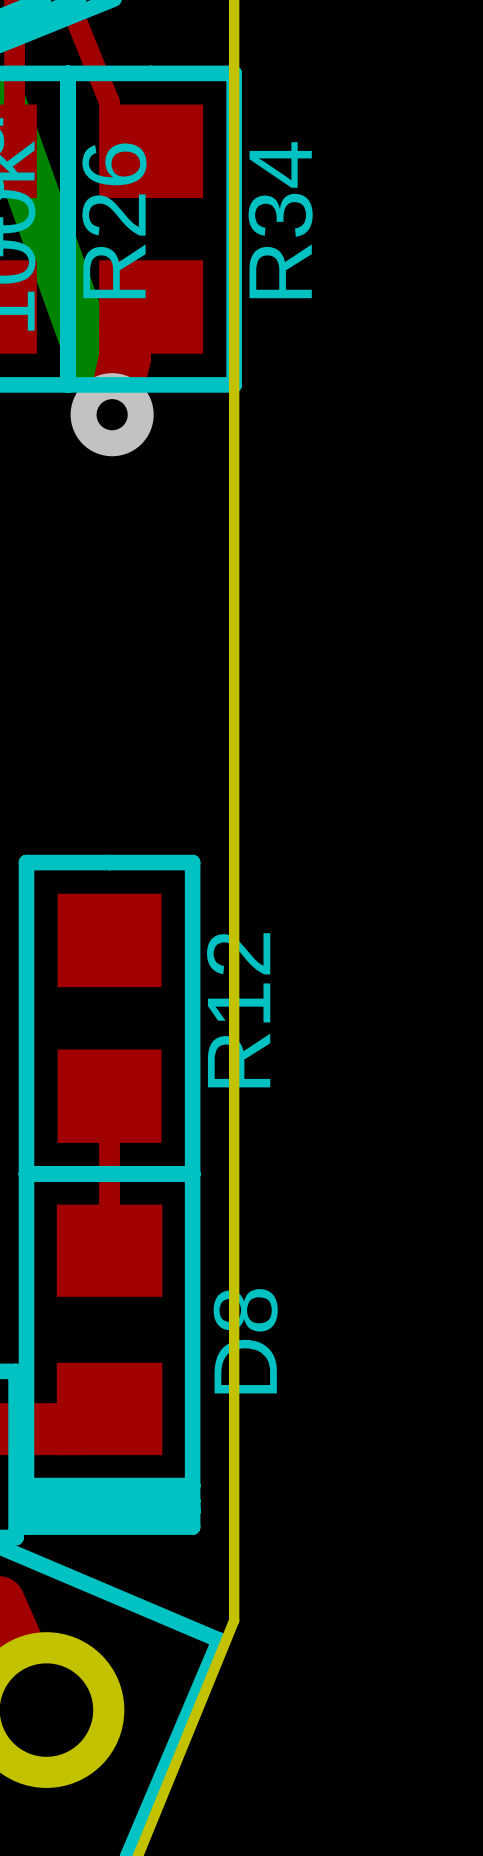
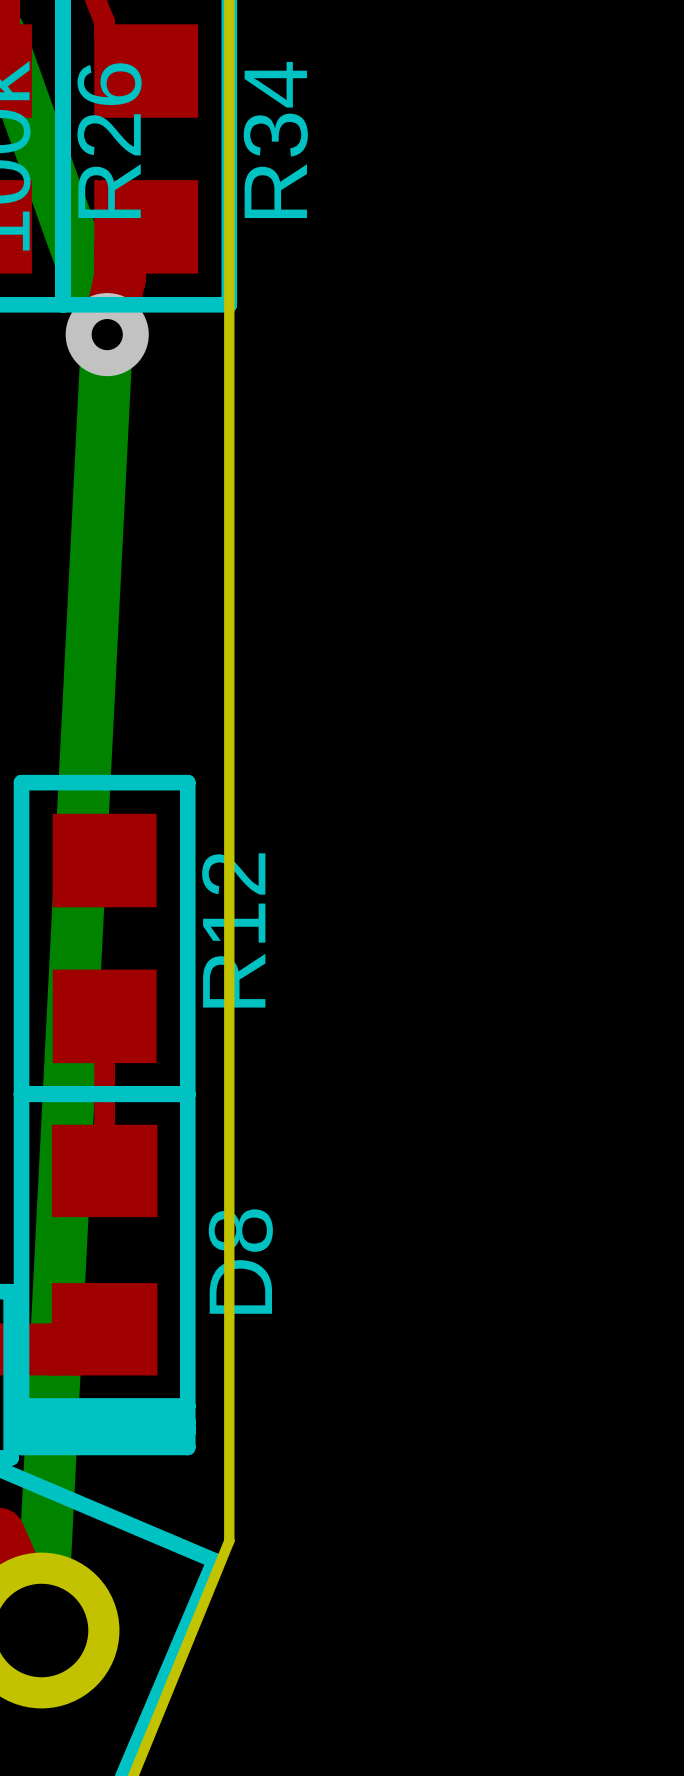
bottom track: none -> (107, 334) (41, 1630)

